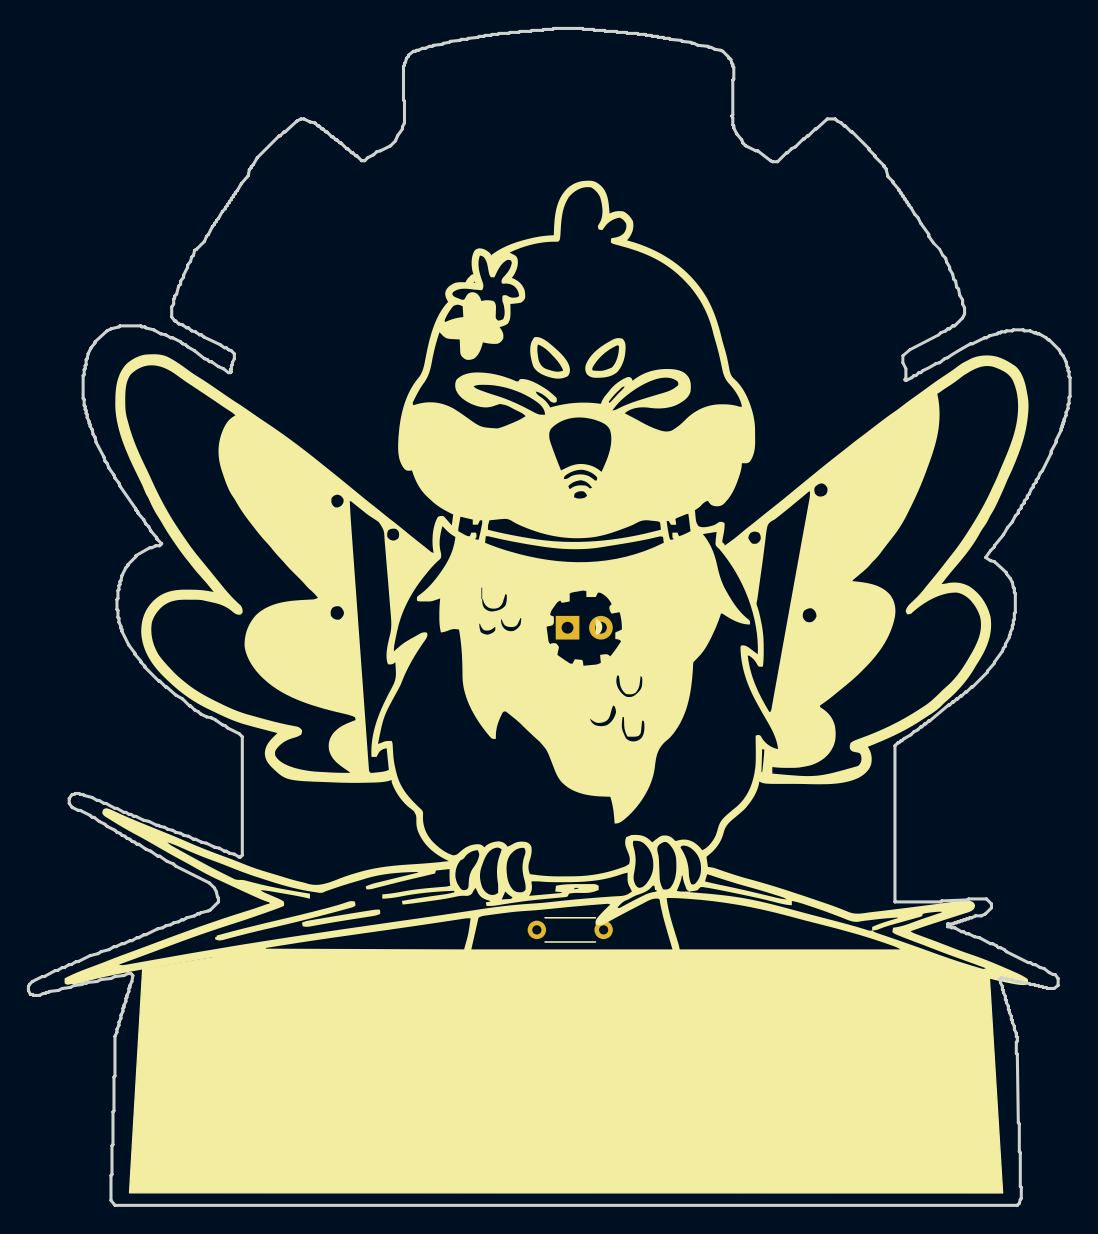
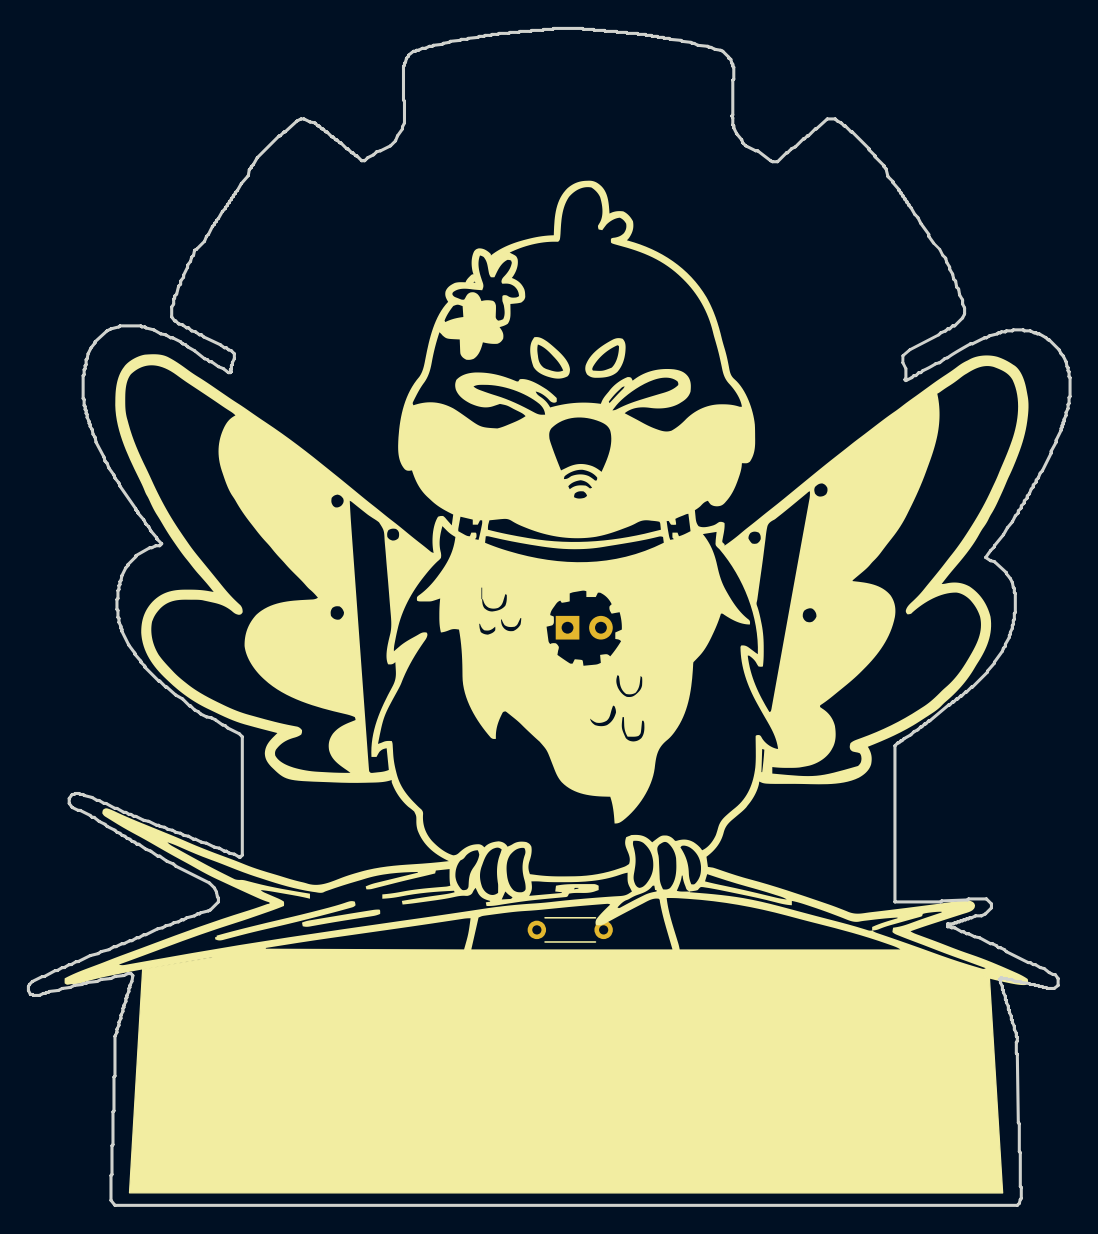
drawing: [595, 618, 603, 635] -> none

